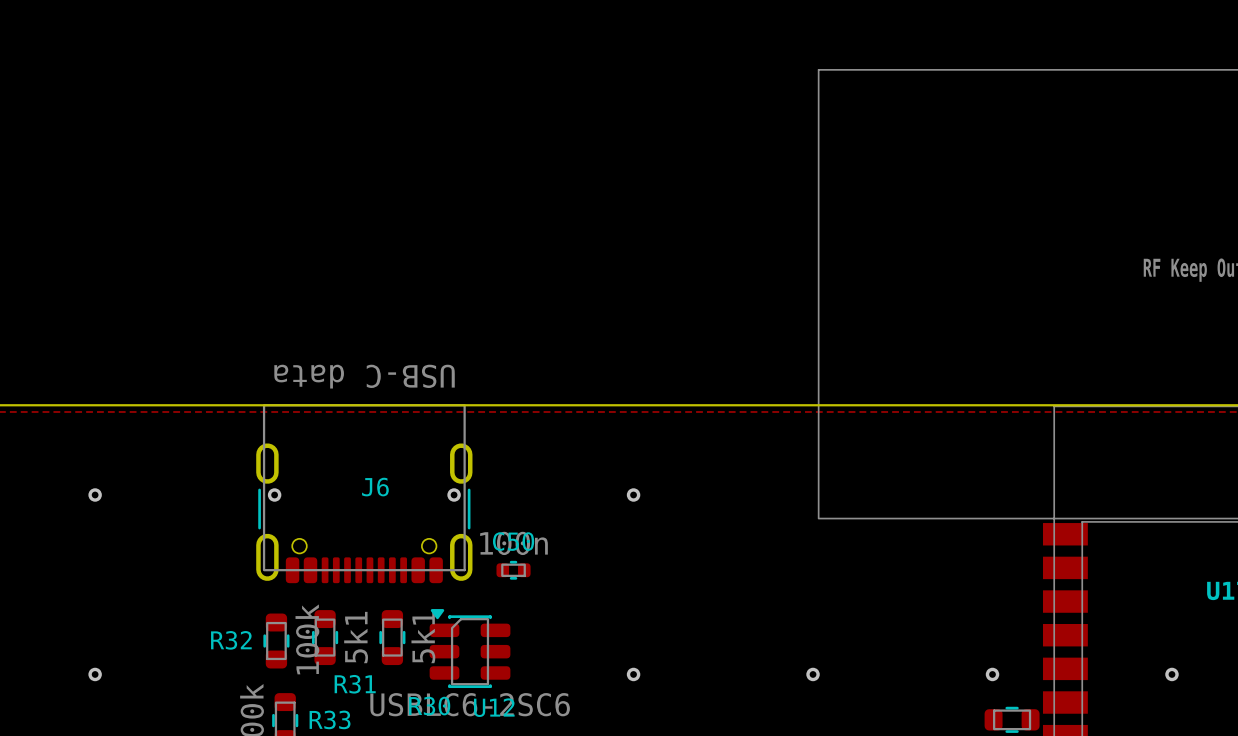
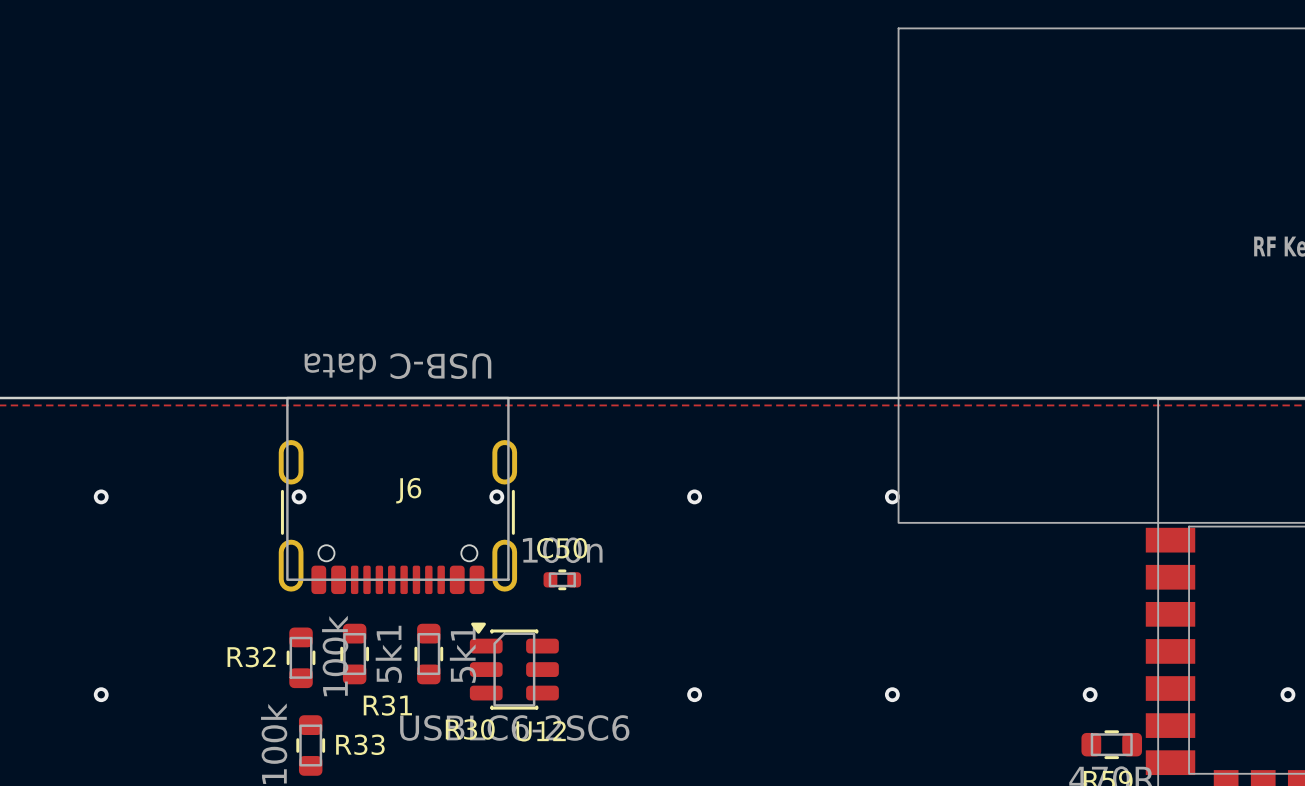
via: none -> (892, 496)

